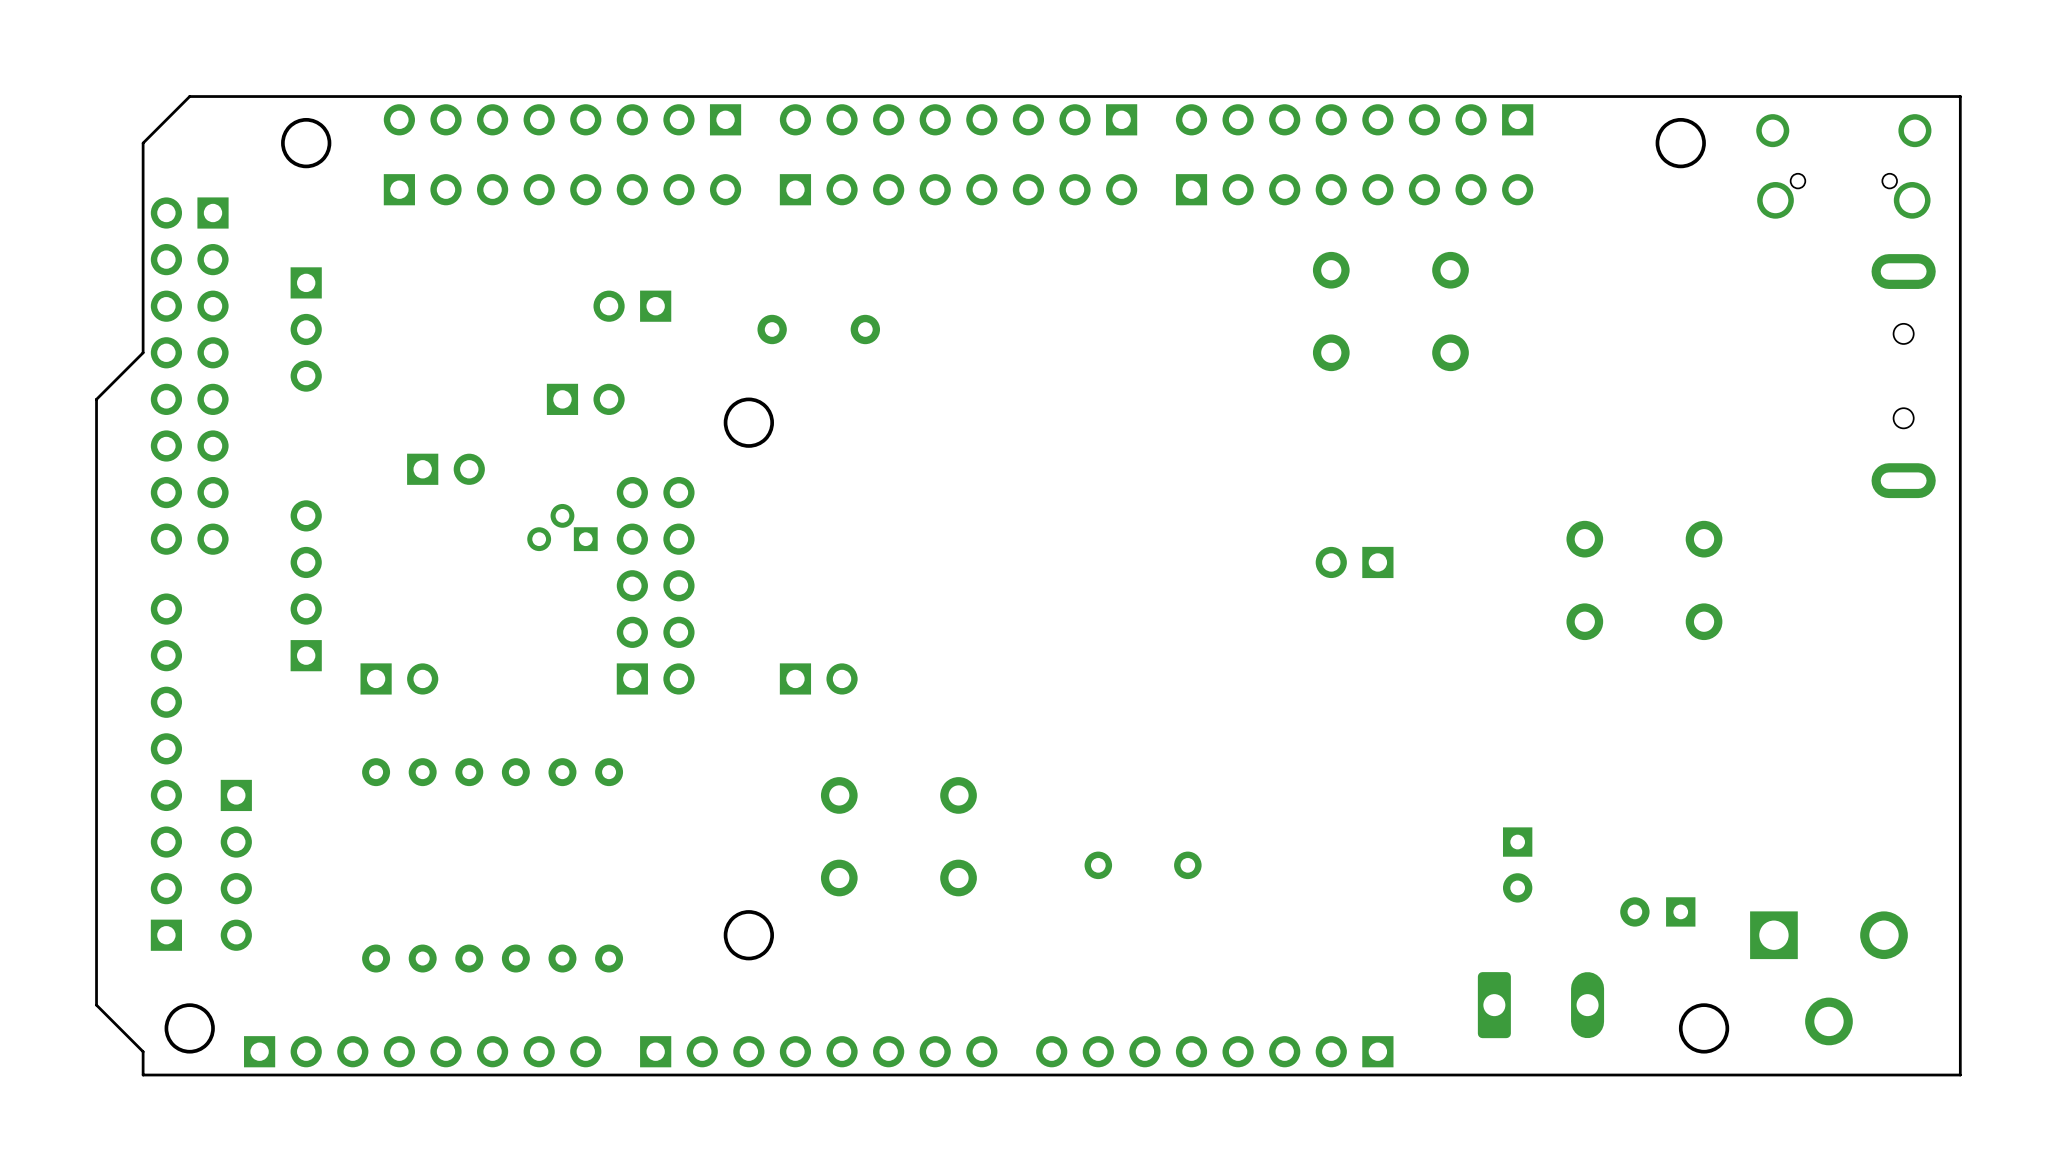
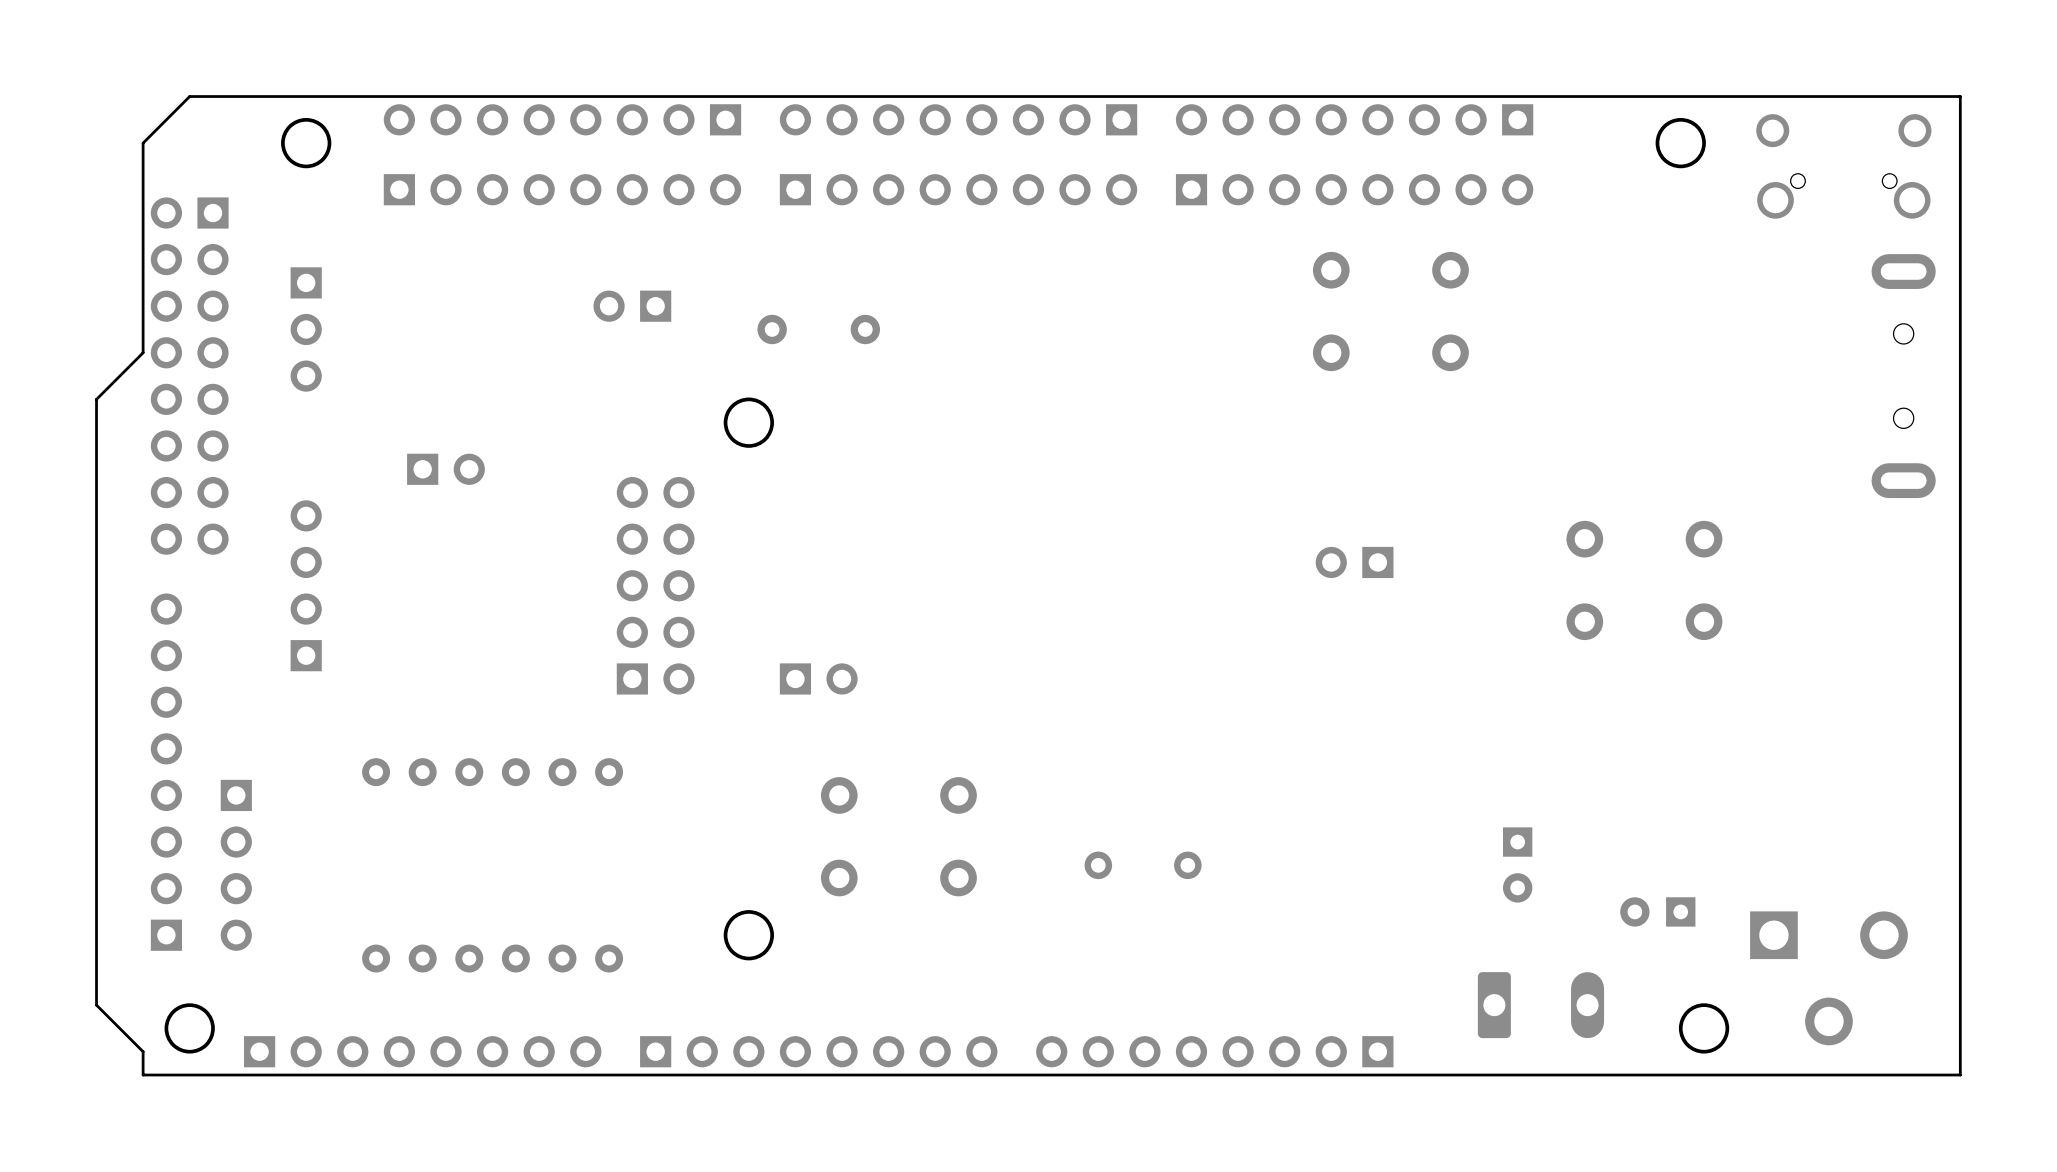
part: (585, 399) -> none
part: (562, 527) -> none
part: (399, 678) -> none

